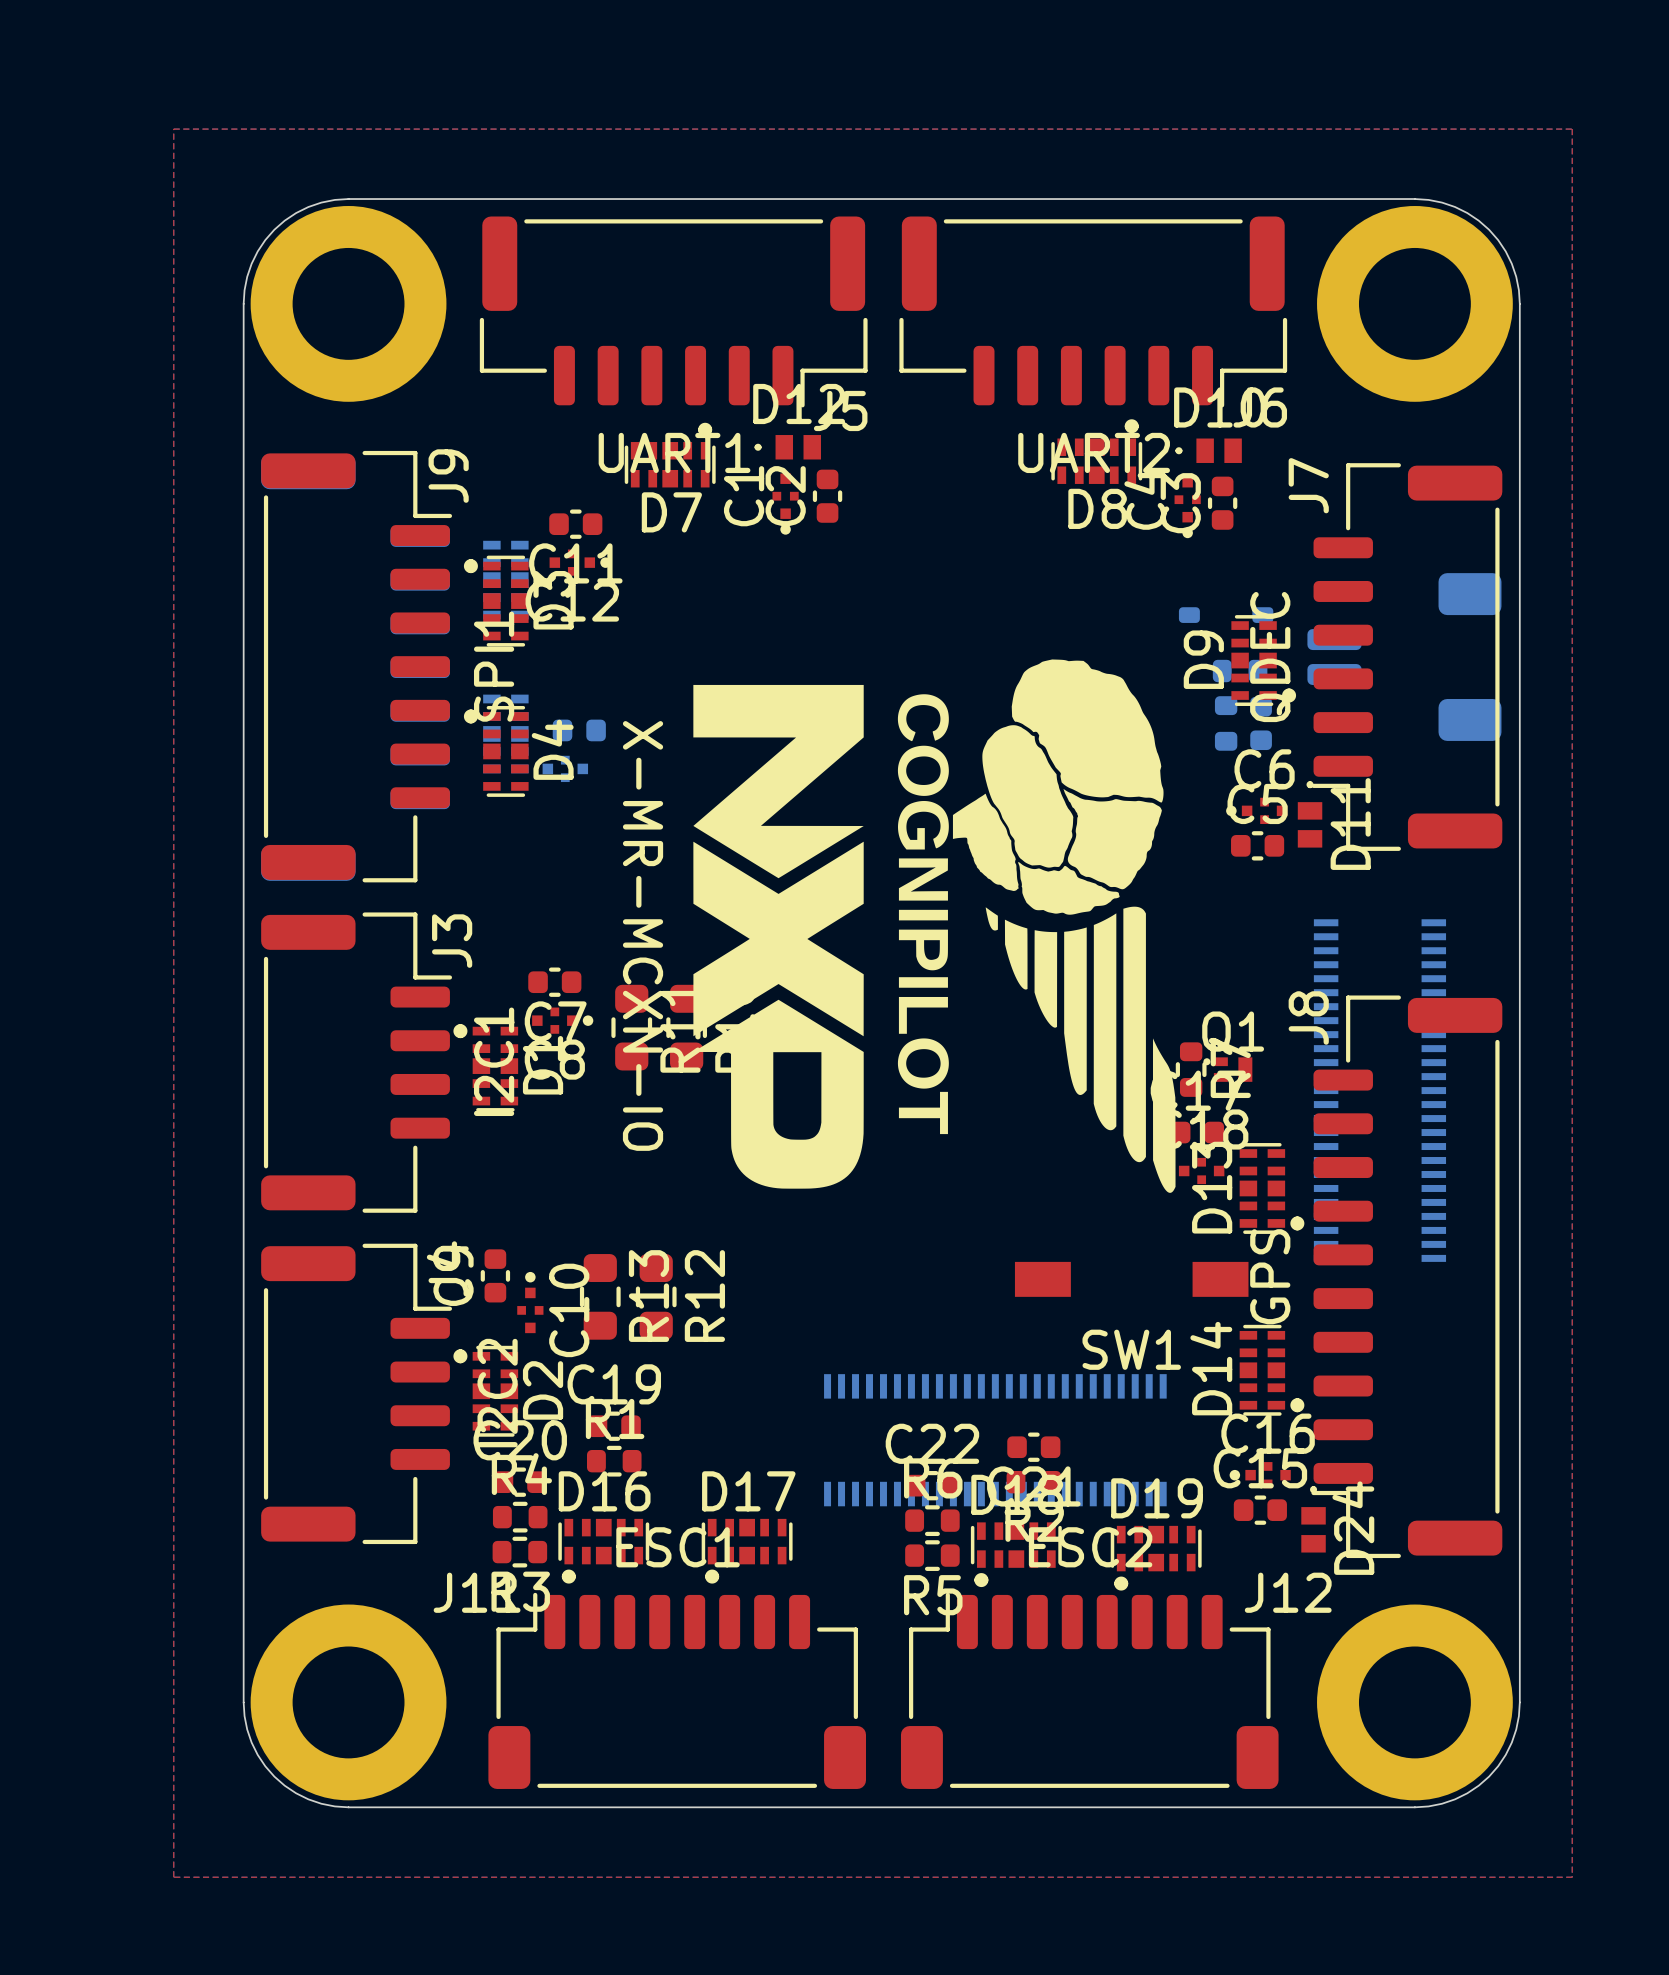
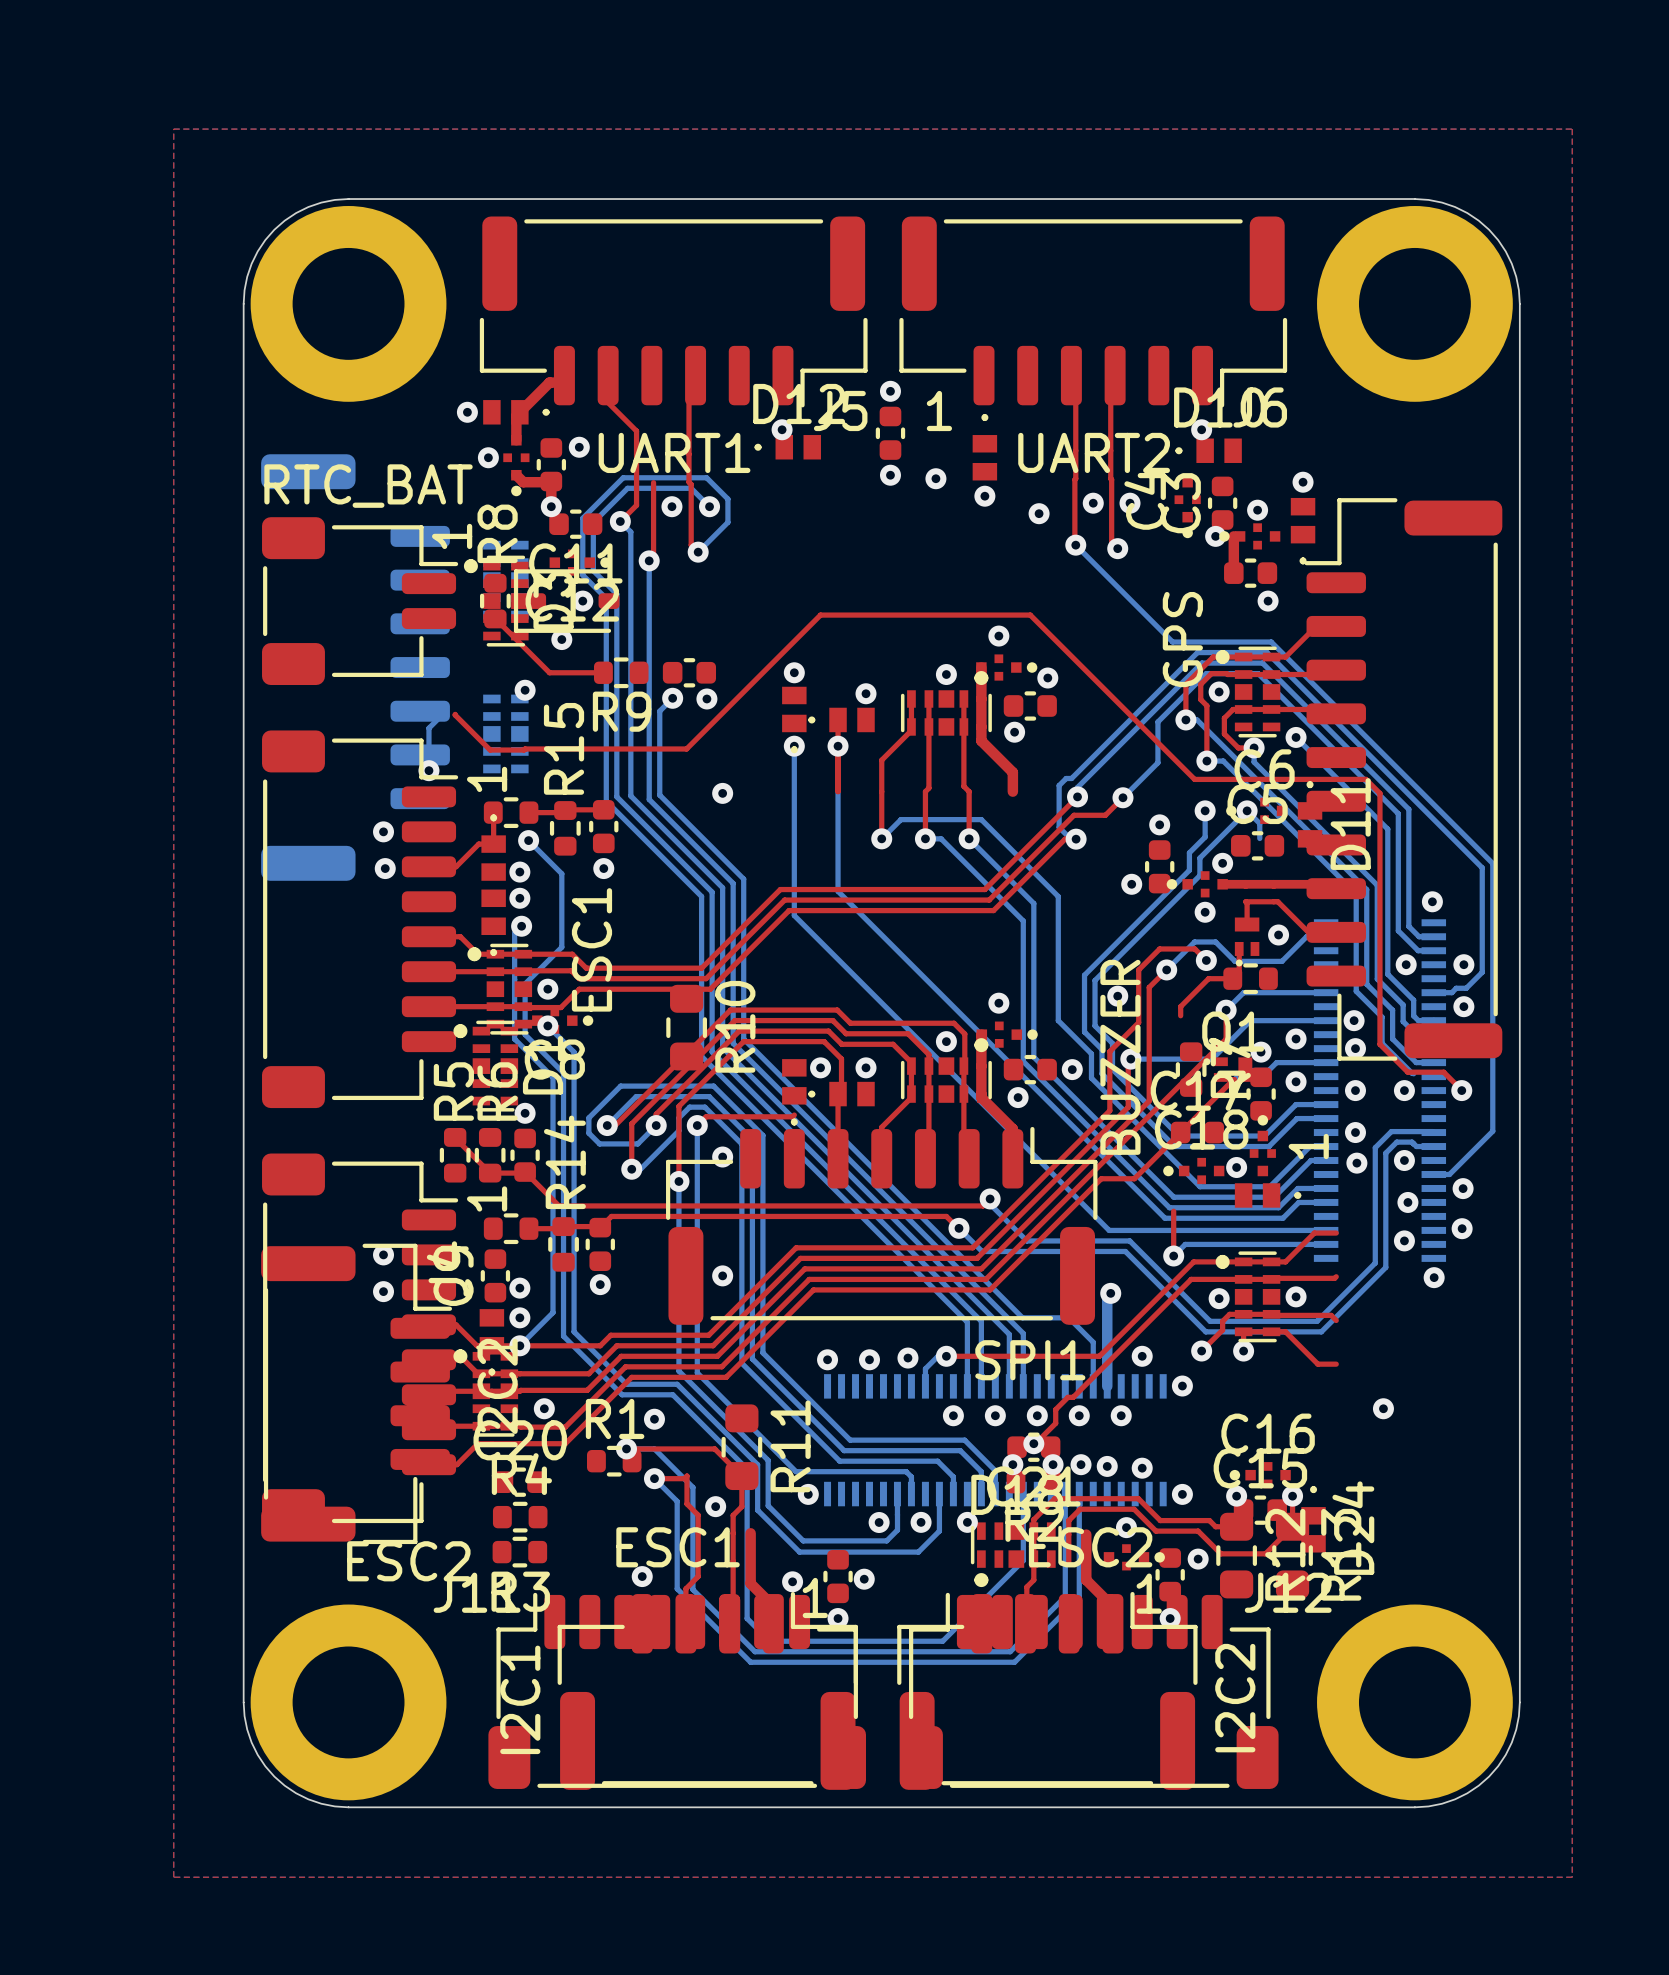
top track: none -> (562, 382) (549, 382) (516, 415) (516, 440)
top track: none -> (605, 382) (605, 400) (636, 431) (636, 505) (620, 521)
top track: none -> (693, 382) (689, 386) (689, 482) (691, 484) (691, 545) (698, 552)
top track: none -> (1071, 382) (1075, 386) (1075, 545)
top track: none -> (1115, 382) (1110, 386) (1111, 544) (1117, 548)
via: none -> (890, 391)
text: none -> 1 (939, 410)
via: none -> (467, 412)
part: none -> (516, 412)
via: none -> (782, 429)
via: none -> (1201, 429)
part: none -> (890, 433)
via: none -> (579, 447)
part: none -> (984, 447)
D8: (1096, 451) -> none
D7: (670, 455) -> none
via: none -> (488, 457)
part: none -> (551, 464)
part: none -> (516, 465)
top track: none -> (516, 475) (523, 482) (551, 481) (551, 506)
via: none -> (890, 475)
via: none -> (935, 478)
top track: none -> (653, 482) (653, 556) (649, 560)
via: none -> (1303, 482)
C2: (827, 496) -> none
via: none -> (984, 496)
via: none -> (1093, 503)
via: none -> (1130, 503)
C1: (785, 504) -> none
via: none -> (551, 506)
via: none -> (671, 506)
bottom track: none -> (709, 506) (691, 488) (627, 488) (593, 522) (593, 570) (616, 594) (616, 796) (712, 892) (712, 1052) (981, 1321) (981, 1386)
via: none -> (709, 506)
via: none -> (1257, 510)
via: none -> (1039, 513)
bottom track: none -> (620, 521) (630, 532) (630, 795) (722, 887) (722, 1047) (1009, 1334) (1009, 1386)
via: none -> (620, 521)
part: none -> (1303, 531)
text: none -> 1 (452, 536)
via: none -> (1215, 536)
top track: none -> (1233, 536) (1233, 573)
part: none -> (1249, 536)
bottom track: none -> (1075, 545) (1172, 642) (1271, 642) (1492, 863) (1492, 1131) (1449, 1174) (1433, 1174)
via: none -> (1075, 545)
via: none -> (1117, 548)
bottom track: none -> (698, 552) (727, 522) (727, 499) (706, 477) (623, 477) (582, 518) (582, 575) (606, 598) (606, 801) (701, 896) (701, 1056) (967, 1322) (967, 1386)
via: none -> (698, 552)
bottom track: none -> (649, 560) (649, 799) (733, 883) (733, 1043) (1023, 1333) (1023, 1386)
via: none -> (649, 560)
part: none -> (1250, 573)
part: none -> RTC_BAT (360, 601)
via: none -> (582, 601)
via: none -> (1268, 601)
part side: bottom (1226, 615) -> top (566, 601)
top track: none -> (495, 618) (549, 672) (603, 672)
top track: none -> (1336, 626) (1316, 626) (1285, 657) (1213, 657) (1185, 684) (1185, 719)
via: none -> (998, 636)
via: none -> (561, 639)
part: (1404, 657) -> none
J7: QDEC (1406, 657) -> none
drawing: [693, 659, 1176, 1193] -> none
D9: (1263, 660) -> none
J9: SPI1 (356, 666) -> none
top track: none -> (981, 667) (981, 740) (1012, 772) (1012, 791)
top track: none -> (1336, 670) (1331, 674) (1211, 673) (1200, 684) (1200, 699) (1206, 705) (1206, 761)
R8 side: bottom (1240, 671) -> top (495, 601)
via: none -> (794, 672)
via: none -> (946, 674)
via: none -> (1047, 678)
via: none -> (525, 690)
via: none -> (1219, 692)
part: none -> (1247, 692)
via: none -> (866, 693)
bottom track: none -> (672, 698) (659, 711) (659, 795) (743, 879) (743, 1039) (1022, 1317) (1068, 1317) (1093, 1342) (1093, 1386)
via: none -> (672, 698)
via: none -> (706, 698)
top track: none -> (911, 698) (911, 730) (881, 760) (881, 838)
top track: none -> (928, 698) (928, 788) (925, 791) (925, 838)
top track: none -> (963, 698) (963, 786) (969, 791) (969, 838)
part: none -> (946, 703)
top track: none -> (1336, 713) (1331, 709) (1233, 709) (1224, 718) (1224, 733) (1238, 747) (1254, 747)
top track: none -> (455, 714) (490, 750) (686, 748) (820, 615) (1030, 615) (1194, 779) (1365, 779) (1379, 793) (1379, 1044) (1407, 1072) (1443, 1072) (1461, 1090)
bottom track: none -> (439, 717) (428, 728) (428, 770)
part: none -> (794, 719)
top track: none -> (838, 719) (838, 791)
part: none -> (841, 719)
bottom track: none -> (1185, 719) (1197, 719) (1366, 889) (1366, 984) (1392, 1010) (1392, 1038) (1416, 1062) (1433, 1062)
via: none -> (1185, 719)
R9 side: bottom (1226, 723) -> top (621, 672)
part side: bottom (1261, 723) -> top (689, 672)
part side: bottom (579, 730) -> top (1030, 705)
via: none -> (1014, 732)
bottom track: none -> (1296, 737) (1387, 829) (1387, 974) (1413, 1000) (1413, 1015) (1418, 1020) (1433, 1020)
via: none -> (1296, 737)
bottom track: none -> (794, 746) (794, 915) (1109, 1230) (1326, 1230)
via: none -> (794, 746)
bottom track: none -> (838, 746) (838, 891) (1165, 1218) (1282, 1218) (1298, 1202) (1326, 1202)
via: none -> (838, 746)
bottom track: none -> (1254, 747) (1254, 762) (1377, 885) (1377, 979) (1403, 1004) (1403, 1021) (1416, 1034) (1433, 1034)
via: none -> (1254, 747)
D4: (496, 751) -> none
bottom track: none -> (1206, 761) (1223, 761) (1356, 893) (1356, 991) (1382, 1017) (1382, 1043) (1413, 1073)
via: none -> (1206, 761)
part side: bottom (565, 768) -> top (1006, 667)
via: none -> (428, 770)
text: none -> 1 (487, 779)
part: none -> GPS (1403, 779)
via: none -> (722, 793)
top track: none -> (1077, 796) (984, 889) (780, 889) (701, 968) (586, 968) (572, 954) (477, 954) (460, 936) (428, 936)
bottom track: none -> (1077, 796) (1077, 787) (1201, 663) (1262, 663) (1408, 809) (1408, 926) (1419, 936) (1433, 936)
via: none -> (1077, 796)
top track: none -> (1122, 797) (1105, 815) (1074, 815) (989, 900) (784, 900) (706, 978) (579, 978) (571, 970) (428, 971)
bottom track: none -> (1122, 797) (1157, 762) (1157, 721) (1206, 673) (1258, 673) (1398, 813) (1398, 930) (1418, 950) (1433, 950)
via: none -> (1122, 797)
top track: none -> (603, 809) (528, 812)
bottom track: none -> (1205, 810) (1205, 837) (1189, 852) (1189, 870) (1084, 975) (1084, 1031) (1102, 1049) (1102, 1073) (1174, 1146) (1268, 1146) (1296, 1118) (1326, 1118)
via: none -> (1205, 810)
via: none -> (1247, 810)
top track: none -> (493, 812) (493, 844) (478, 844) (456, 866) (428, 866)
part: none -> (511, 812)
via: none -> (1159, 824)
part: none -> (603, 826)
R15: none -> (565, 828)
via: none -> (383, 831)
bottom track: none -> (881, 838) (900, 819) (981, 819) (1058, 896) (1058, 1020) (1091, 1053) (1091, 1078) (1200, 1186) (1269, 1186) (1310, 1146) (1326, 1146)
via: none -> (881, 838)
bottom track: none -> (925, 838) (941, 838) (1023, 920) (1023, 1061) (1169, 1207) (1278, 1207) (1297, 1188) (1326, 1188)
via: none -> (925, 838)
bottom track: none -> (969, 838) (1033, 903) (1033, 1057) (1173, 1197) (1274, 1197) (1310, 1160) (1326, 1160)
via: none -> (969, 838)
bottom track: none -> (1259, 838) (1259, 823) (1247, 810) (1199, 858) (1199, 875) (1095, 980) (1095, 1025) (1112, 1043) (1112, 1069) (1179, 1136) (1264, 1136) (1296, 1104) (1326, 1104)
top track: none -> (1076, 839) (1065, 839) (993, 910) (789, 910) (710, 989) (579, 989) (560, 1007) (428, 1006)
bottom track: none -> (1076, 839) (1070, 839) (1059, 827) (1059, 785) (1066, 778) (1071, 778) (1197, 652) (1266, 652) (1482, 867) (1482, 972) (1466, 988) (1456, 988) (1451, 992) (1433, 992)
via: none -> (1076, 839)
bottom track: none -> (528, 840) (561, 873) (561, 947) (525, 983) (525, 1034) (563, 1073) (563, 1336) (622, 1394) (672, 1394) (747, 1469) (747, 1618) (769, 1641) (942, 1641) (1023, 1560) (1023, 1494)
via: none -> (528, 840)
part: none -> (493, 847)
via: none -> (1222, 863)
part: none -> (1159, 866)
via: none -> (385, 868)
via: none -> (603, 868)
via: none -> (519, 872)
via: none -> (1131, 884)
part: none -> (1197, 884)
top track: none -> (1222, 884) (1331, 884) (1336, 888)
via: none -> (519, 898)
via: none -> (1432, 901)
via: none -> (1205, 912)
part: none -> ESC1 (360, 919)
part: none -> (493, 922)
top track: none -> (1247, 924) (1245, 901) (1277, 901) (1308, 932) (1336, 932)
bottom track: none -> (521, 926) (514, 933) (514, 1039) (553, 1077) (553, 1312) (519, 1345)
via: none -> (521, 926)
via: none -> (1278, 934)
text: X-MR-MCXN-IO (643, 935) -> none
bottom track: none -> (1326, 936) (1306, 936) (1281, 961) (1235, 961) (1215, 941) (1194, 941) (1166, 969)
part: none -> (1247, 941)
top track: none -> (1239, 948) (1239, 972) (1232, 978) (1208, 978) (1180, 1006) (1180, 1015)
top track: none -> (1206, 960) (1194, 948) (1159, 948) (1138, 969) (1138, 1022) (1109, 1051) (1109, 1110) (972, 1247) (796, 1247) (708, 1335) (610, 1335) (600, 1345) (477, 1345) (456, 1324) (428, 1324)
via: none -> (1206, 960)
via: none -> (1406, 964)
via: none -> (1463, 964)
top track: none -> (1166, 969) (1149, 987) (1149, 1101) (981, 1268) (804, 1268) (717, 1356) (621, 1356) (587, 1390) (432, 1391) (428, 1394)
via: none -> (1166, 969)
part: none -> (1250, 978)
C7: (554, 982) -> none
part: none -> (499, 989)
via: none -> (547, 989)
bottom track: none -> (1326, 992) (1243, 992) (1226, 1010)
via: none -> (1117, 996)
via: none -> (998, 1003)
via: none -> (1463, 1006)
top track: none -> (1226, 1010) (1226, 1039) (985, 1279) (809, 1279) (721, 1366) (625, 1366) (565, 1427) (432, 1426) (428, 1429)
via: none -> (1226, 1010)
bottom track: none -> (1326, 1020) (1250, 1020) (1212, 1059) (1130, 1059)
via: none -> (1354, 1020)
bottom track: none -> (547, 1025) (574, 1052) (574, 1331) (626, 1384) (677, 1384) (757, 1464) (757, 1510) (799, 1552) (918, 1552) (939, 1531) (939, 1494)
via: none -> (547, 1025)
R11 position: (631, 1027) -> (741, 1447)
part: none -> (1007, 1034)
top track: none -> (981, 1035) (981, 1097) (1012, 1129) (1012, 1158)
via: none -> (1296, 1039)
via: none -> (946, 1041)
via: none -> (1355, 1048)
via: none -> (1261, 1052)
text: none -> BUZZER (1120, 1057)
top track: none -> (1130, 1059) (1128, 1061) (1128, 1107) (977, 1258) (800, 1258) (713, 1345) (616, 1345) (588, 1373) (477, 1373) (463, 1359) (428, 1359)
via: none -> (1130, 1059)
J3: I2C1 (356, 1062) -> none
bottom track: none -> (1326, 1062) (1276, 1062) (1268, 1070) (1243, 1070) (1234, 1079)
via: none -> (820, 1067)
via: none -> (866, 1067)
part: none -> (1030, 1069)
via: none -> (1072, 1069)
part: none -> (946, 1070)
top track: none -> (1234, 1079) (1134, 1178) (1101, 1178) (990, 1289) (813, 1289) (726, 1377) (631, 1377) (565, 1443) (477, 1443) (456, 1464) (428, 1464)
via: none -> (1296, 1081)
via: none -> (1355, 1090)
via: none -> (1404, 1090)
via: none -> (1461, 1090)
part: none -> (794, 1092)
part: none -> (841, 1094)
part: none -> (1261, 1094)
via: none -> (1018, 1097)
via: none -> (525, 1113)
top track: none -> (794, 1115) (792, 1116) (706, 1116) (697, 1125)
top track: none -> (607, 1125) (615, 1125) (730, 1010) (837, 1010) (850, 1023) (954, 1023) (964, 1034) (963, 1153) (969, 1158)
bottom track: none -> (607, 1125) (636, 1096) (709, 1096) (752, 1139) (752, 1358) (844, 1450) (960, 1450) (981, 1471) (981, 1494)
via: none -> (607, 1125)
top track: none -> (656, 1125) (656, 1114) (739, 1031) (828, 1031) (841, 1044) (893, 1044) (911, 1062) (911, 1097) (881, 1127) (881, 1158)
bottom track: none -> (656, 1125) (637, 1143) (599, 1143) (588, 1133) (588, 1117) (620, 1086) (713, 1086) (762, 1135) (762, 1352) (850, 1440) (964, 1440) (995, 1470) (995, 1494)
via: none -> (656, 1125)
bottom track: none -> (697, 1125) (697, 1372) (796, 1471) (906, 1471) (911, 1476) (911, 1494)
via: none -> (697, 1125)
via: none -> (1355, 1132)
bottom track: none -> (1433, 1132) (1391, 1131) (1375, 1147) (1375, 1263) (1317, 1321) (1210, 1321) (1129, 1240) (1026, 1240) (990, 1204) (990, 1198)
top track: none -> (455, 1138) (490, 1173) (525, 1172) (559, 1205) (983, 1205) (990, 1198)
part: none -> (1262, 1145)
text: none -> 1 (1308, 1146)
bottom track: none -> (1433, 1146) (1416, 1146) (1412, 1142) (1396, 1142) (1385, 1153) (1385, 1267) (1321, 1331) (1205, 1331) (1125, 1251) (982, 1251) (958, 1228)
part: none -> (525, 1155)
via: none -> (722, 1157)
top track: none -> (838, 1158) (838, 1094) (841, 1090) (841, 1058) (824, 1041) (743, 1041) (678, 1106) (678, 1181)
top track: none -> (925, 1158) (928, 1155) (928, 1054) (908, 1033) (846, 1033) (832, 1020) (734, 1020) (631, 1123) (631, 1169)
via: none -> (1404, 1160)
via: none -> (1356, 1163)
via: none -> (1236, 1167)
bottom track: none -> (631, 1169) (640, 1169) (678, 1130) (678, 1117) (689, 1107) (704, 1107) (741, 1144) (741, 1363) (839, 1461) (937, 1461) (953, 1476) (953, 1494)
via: none -> (631, 1169)
bottom track: none -> (678, 1181) (678, 1371) (768, 1460) (768, 1505) (803, 1540) (886, 1540) (897, 1530) (897, 1494)
via: none -> (678, 1181)
D13: (1272, 1188) -> none
via: none -> (1463, 1188)
part: none -> (1268, 1195)
text: none -> 1 (487, 1198)
via: none -> (990, 1198)
via: none -> (1407, 1202)
top track: none -> (1173, 1211) (1173, 1256)
part: none -> SPI1 (881, 1225)
part: none -> (511, 1228)
top track: none -> (958, 1228) (946, 1216) (611, 1216) (600, 1227) (563, 1226) (561, 1228) (528, 1228)
via: none -> (958, 1228)
via: none -> (1462, 1228)
top track: none -> (1336, 1233) (1314, 1233) (1285, 1261) (1193, 1261) (1099, 1356) (946, 1356)
via: none -> (1404, 1240)
R14: none -> (563, 1244)
part: none -> (600, 1244)
bottom track: none -> (1326, 1244) (1185, 1244) (1173, 1256)
via: none -> (383, 1254)
via: none -> (1173, 1256)
via: none -> (722, 1275)
top track: none -> (1336, 1276) (1334, 1278) (1191, 1279) (1073, 1397) (1067, 1397) (1055, 1409) (1055, 1423) (1033, 1443)
J8: GPS (1406, 1276) -> none
via: none -> (1434, 1277)
SW1: (1131, 1279) -> none
via: none -> (600, 1284)
via: none -> (519, 1288)
via: none -> (383, 1291)
bottom track: none -> (1110, 1293) (1107, 1296) (1107, 1386)
via: none -> (1110, 1293)
R13 position: (600, 1296) -> (1292, 1555)
R12 position: (656, 1296) -> (1236, 1555)
part: none -> (1247, 1296)
via: none -> (1296, 1296)
via: none -> (1219, 1298)
C10: (530, 1302) -> none
via: none -> (519, 1317)
top track: none -> (1336, 1320) (1331, 1315) (1229, 1314) (1222, 1321) (1222, 1330) (1201, 1351)
part: none -> ESC2 (360, 1342)
part: none -> (491, 1342)
via: none -> (519, 1345)
via: none -> (1201, 1351)
top track: none -> (1243, 1351) (1243, 1331) (1285, 1331) (1317, 1364) (1336, 1364)
via: none -> (1243, 1351)
bottom track: none -> (946, 1356) (937, 1356) (925, 1368) (925, 1386)
via: none -> (946, 1356)
via: none -> (1142, 1356)
via: none -> (907, 1358)
via: none -> (827, 1359)
via: none -> (869, 1359)
D14: (1272, 1370) -> none
via: none -> (1182, 1386)
D2 name: D2 (543, 1390) -> none
via: none -> (544, 1408)
via: none -> (1383, 1408)
via: none -> (953, 1415)
via: none -> (995, 1415)
via: none -> (1037, 1415)
via: none -> (1079, 1415)
via: none -> (1121, 1415)
via: none -> (654, 1419)
C19: (614, 1426) -> none
via: none -> (1033, 1443)
top track: none -> (626, 1448) (714, 1448) (741, 1476) (741, 1506) (733, 1515) (733, 1620) (729, 1623)
bottom track: none -> (626, 1448) (654, 1448) (692, 1487) (692, 1589) (755, 1651) (1010, 1651) (1065, 1596) (1065, 1494)
via: none -> (626, 1448)
via: none -> (1012, 1464)
via: none -> (1053, 1464)
via: none -> (1081, 1464)
via: none -> (1107, 1466)
via: none -> (1142, 1468)
top track: none -> (654, 1478) (684, 1478) (686, 1476) (686, 1503) (698, 1515) (698, 1576) (685, 1588) (685, 1623)
bottom track: none -> (654, 1478) (677, 1501) (677, 1588) (750, 1662) (1014, 1662) (1079, 1597) (1079, 1494)
via: none -> (654, 1478)
C22: (932, 1485) -> none
via: none -> (808, 1494)
via: none -> (1182, 1494)
top track: none -> (1236, 1496) (1236, 1526) (1215, 1526) (1209, 1520) (1160, 1520) (1138, 1498) (1054, 1498) (1033, 1519) (1033, 1580) (1026, 1587) (1025, 1623)
via: none -> (1236, 1496)
top track: none -> (1292, 1496) (1292, 1526) (1265, 1553) (1220, 1553) (1198, 1531) (1155, 1531) (1134, 1509) (1080, 1509) (1068, 1520) (1068, 1562)
via: none -> (1292, 1496)
via: none -> (715, 1506)
R6 rotation: 0° (932, 1520) -> 90° clockwise (490, 1155)
R6 position: (932, 1520) -> (490, 1155)
via: none -> (879, 1522)
via: none -> (921, 1522)
via: none -> (967, 1522)
via: none -> (1126, 1527)
top track: none -> (750, 1533) (750, 1583) (773, 1606) (773, 1623)
top track: none -> (1086, 1534) (1086, 1580) (1112, 1606) (1112, 1623)
D16: (603, 1551) -> none
D17: (747, 1551) -> none
R5 rotation: 0° (932, 1555) -> 90° clockwise (455, 1155)
R5 position: (932, 1555) -> (455, 1155)
part: none -> (1134, 1557)
D19: (1156, 1558) -> none
via: none -> (1198, 1559)
part: none -> (1170, 1574)
via: none -> (642, 1576)
part: none -> (838, 1576)
via: none -> (864, 1579)
via: none -> (792, 1581)
text: none -> 1 (1149, 1593)
R5 name position: R5 (933, 1595) -> R5 (453, 1091)
text: none -> 1 (815, 1597)
via: none -> (838, 1618)
via: none -> (1170, 1618)
part: none -> I2C1 (707, 1690)
part: none -> I2C2 (1047, 1690)

